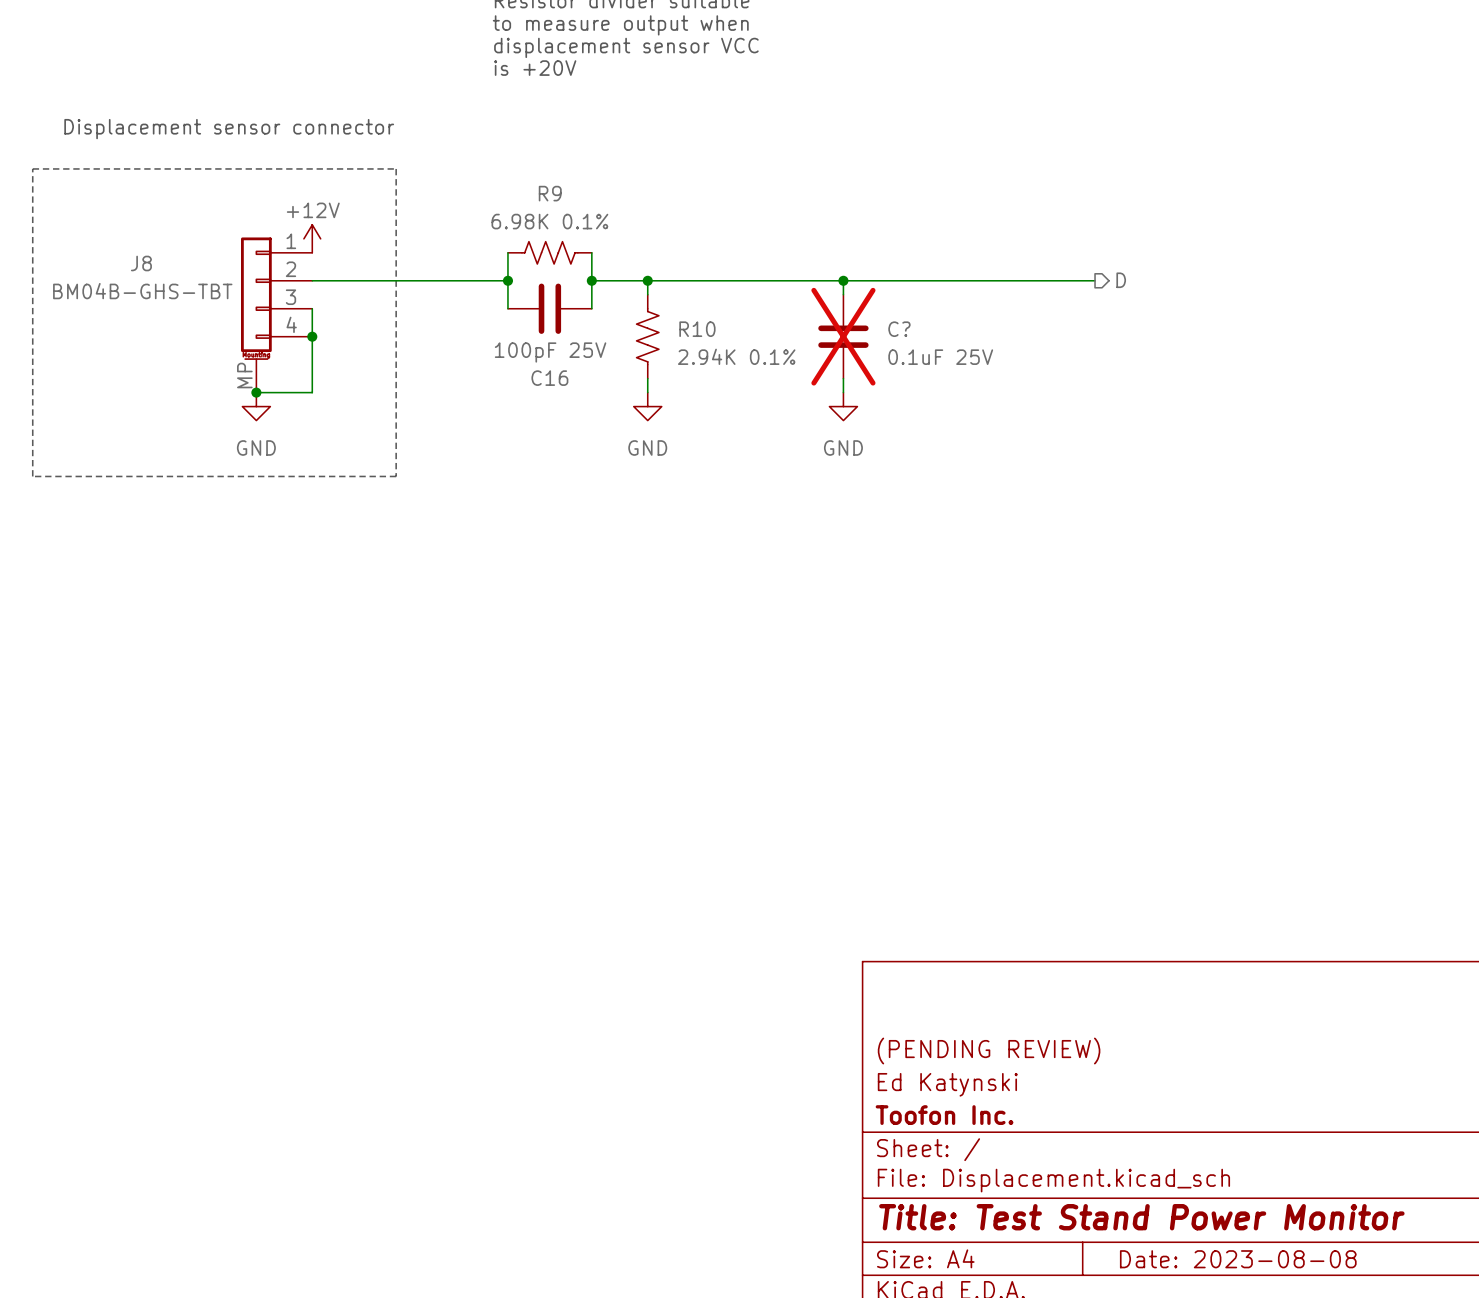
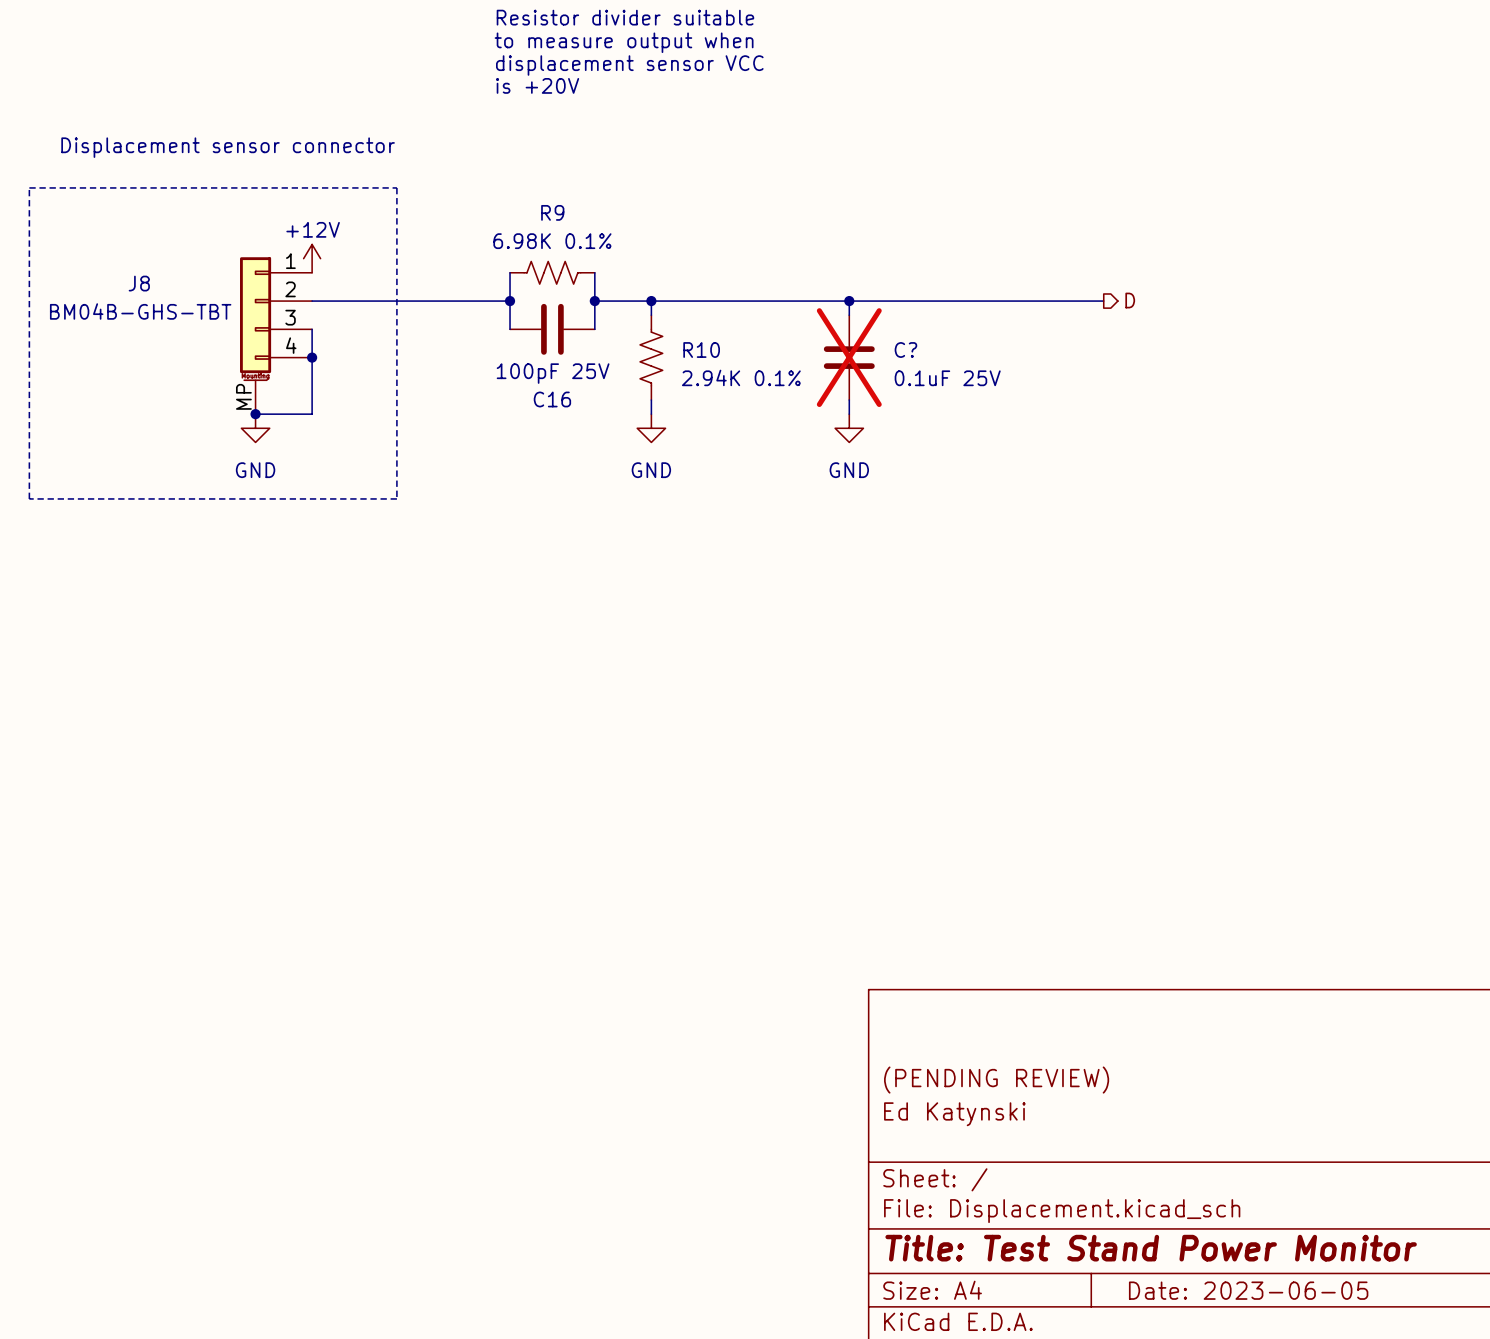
title block: Toofon Inc. (944, 1115) -> none
title block: Date: 2023-08-08 (1238, 1259) -> Date: 2023-06-05 (1248, 1290)

